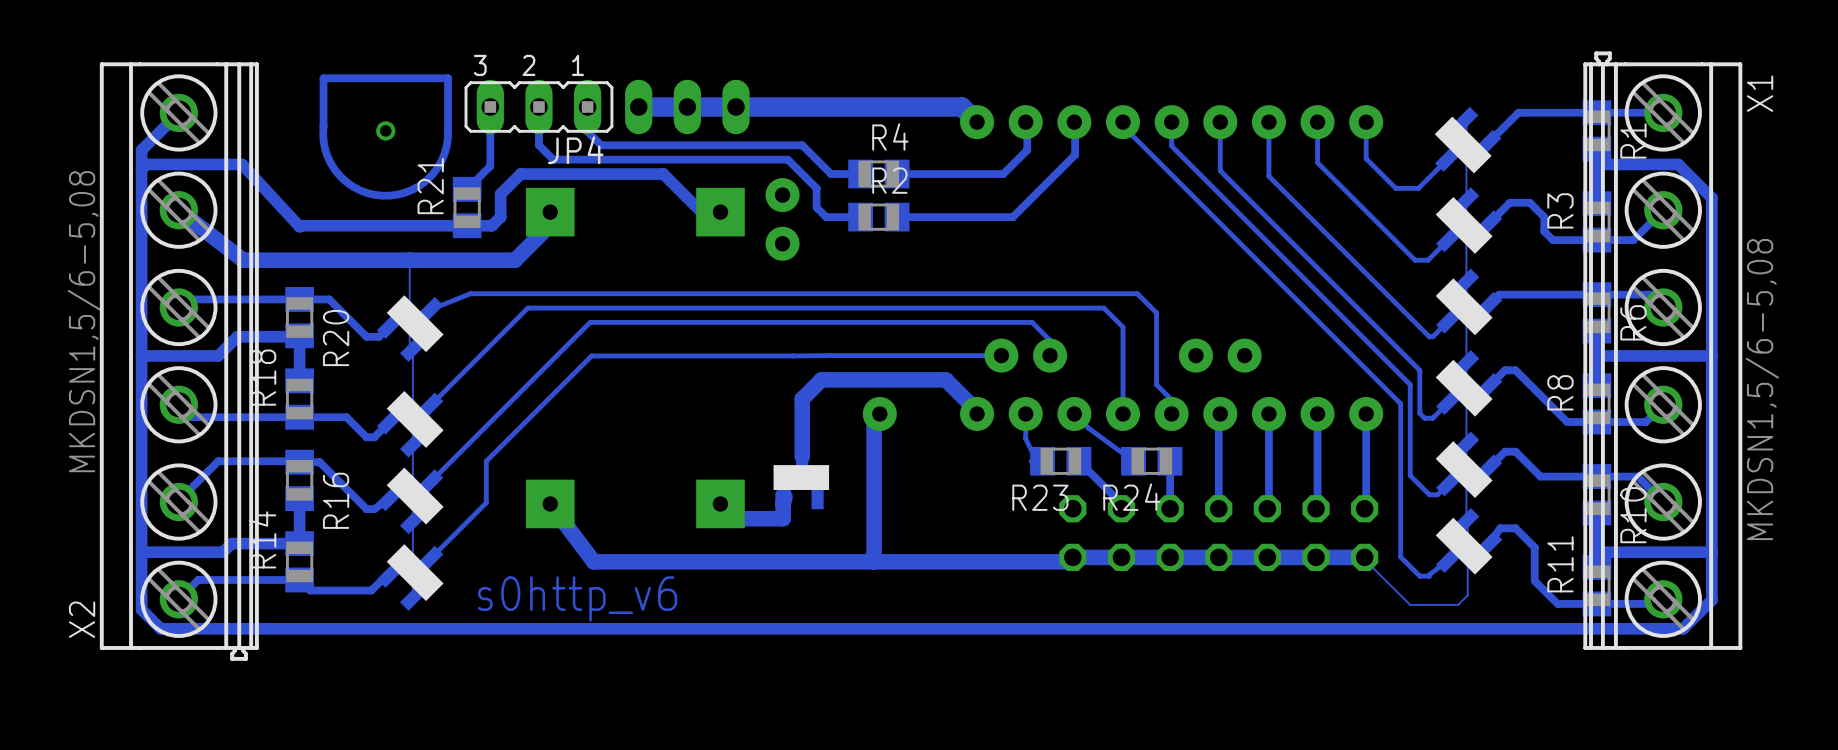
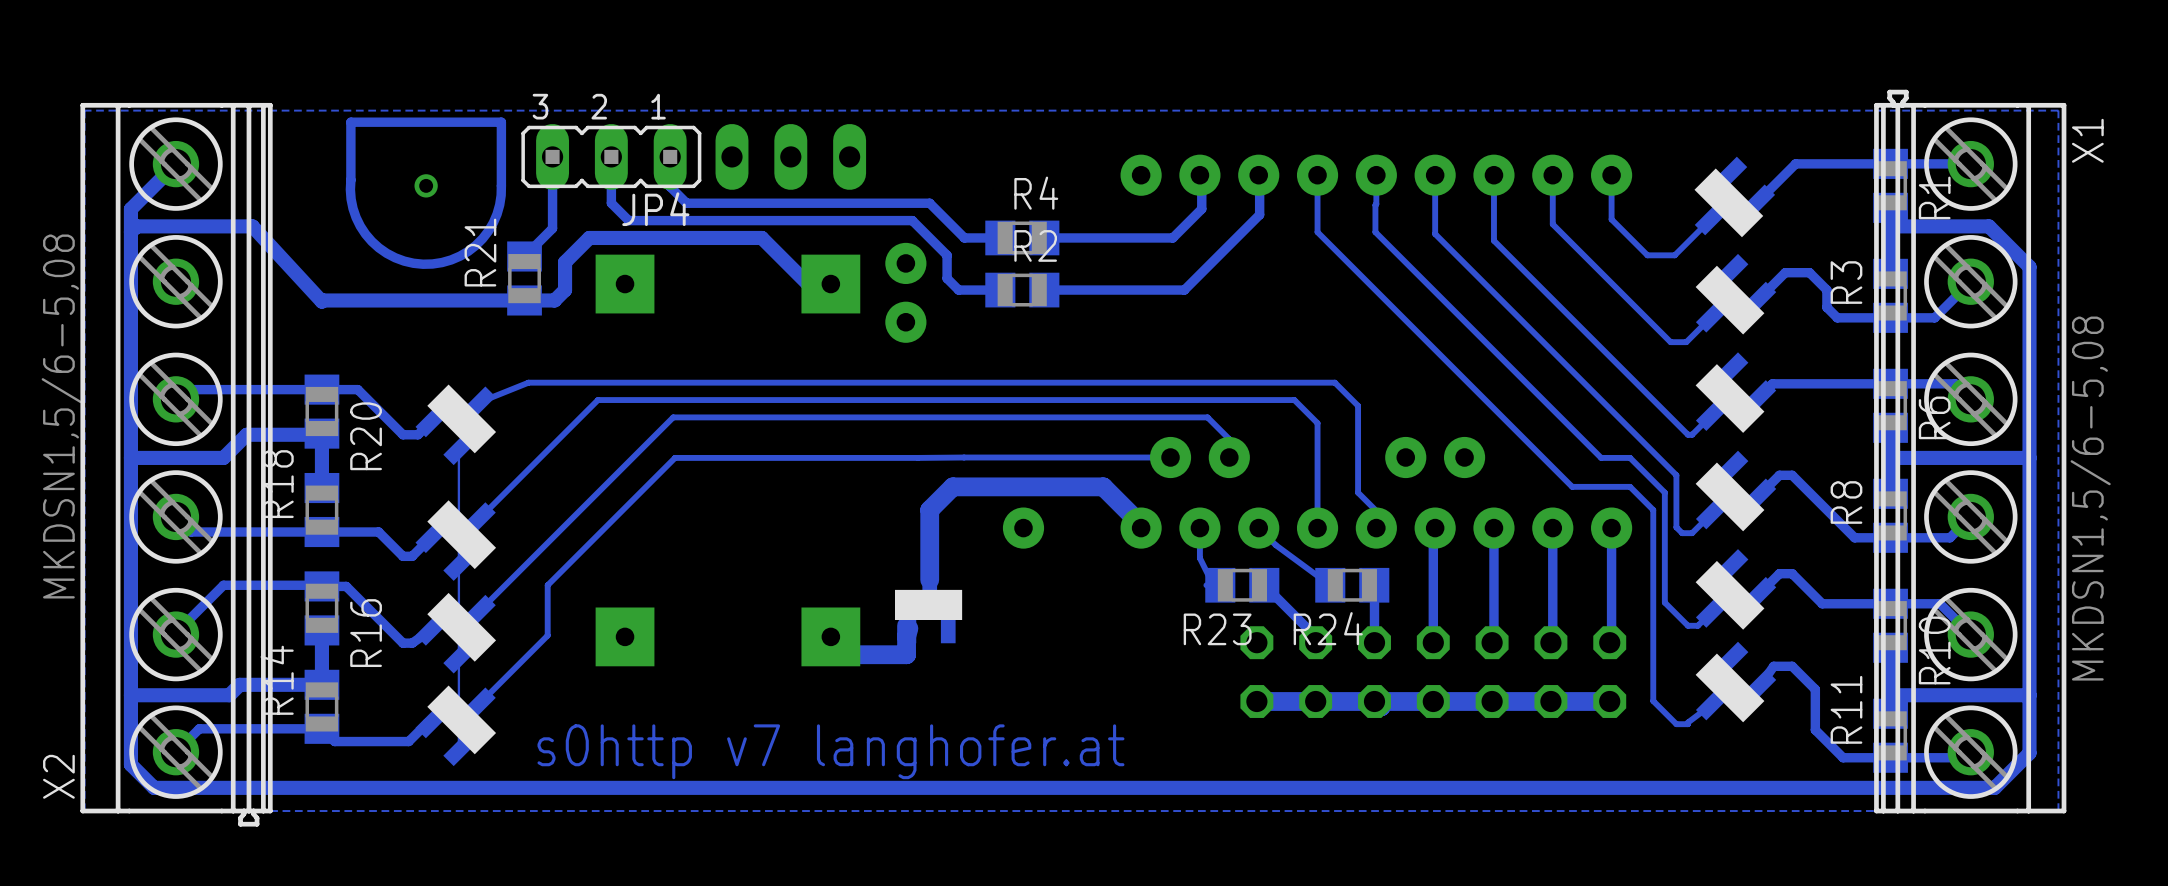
bottom zone outline: none -> (2058, 110) (84, 110) (84, 811) (2058, 811) (2058, 110)
bottom track: (638, 107) (961, 107) (977, 122) -> none
bottom track: (1465, 119) (1467, 595) (1458, 604) (1410, 604) (1362, 557) -> none
bottom track: (1123, 126) (1400, 403) -> (1317, 180) (1317, 232) (1572, 486) (1630, 486) (1653, 510) (1653, 515)
bottom track: (1171, 146) (1381, 355) -> (1376, 204) (1375, 232) (1601, 457) (1630, 457)
bottom track: (178, 210) (243, 260) (515, 260) (558, 217) (550, 212) -> none
bottom track: (409, 260) (409, 355) (412, 358) -> none
bottom track: (879, 413) (874, 419) (874, 561) -> none
bottom track: (550, 503) (593, 561) (1068, 561) (1072, 557) -> none
text: s0http_v6 (577, 598) -> s0http v7 langhofer.at (830, 751)

